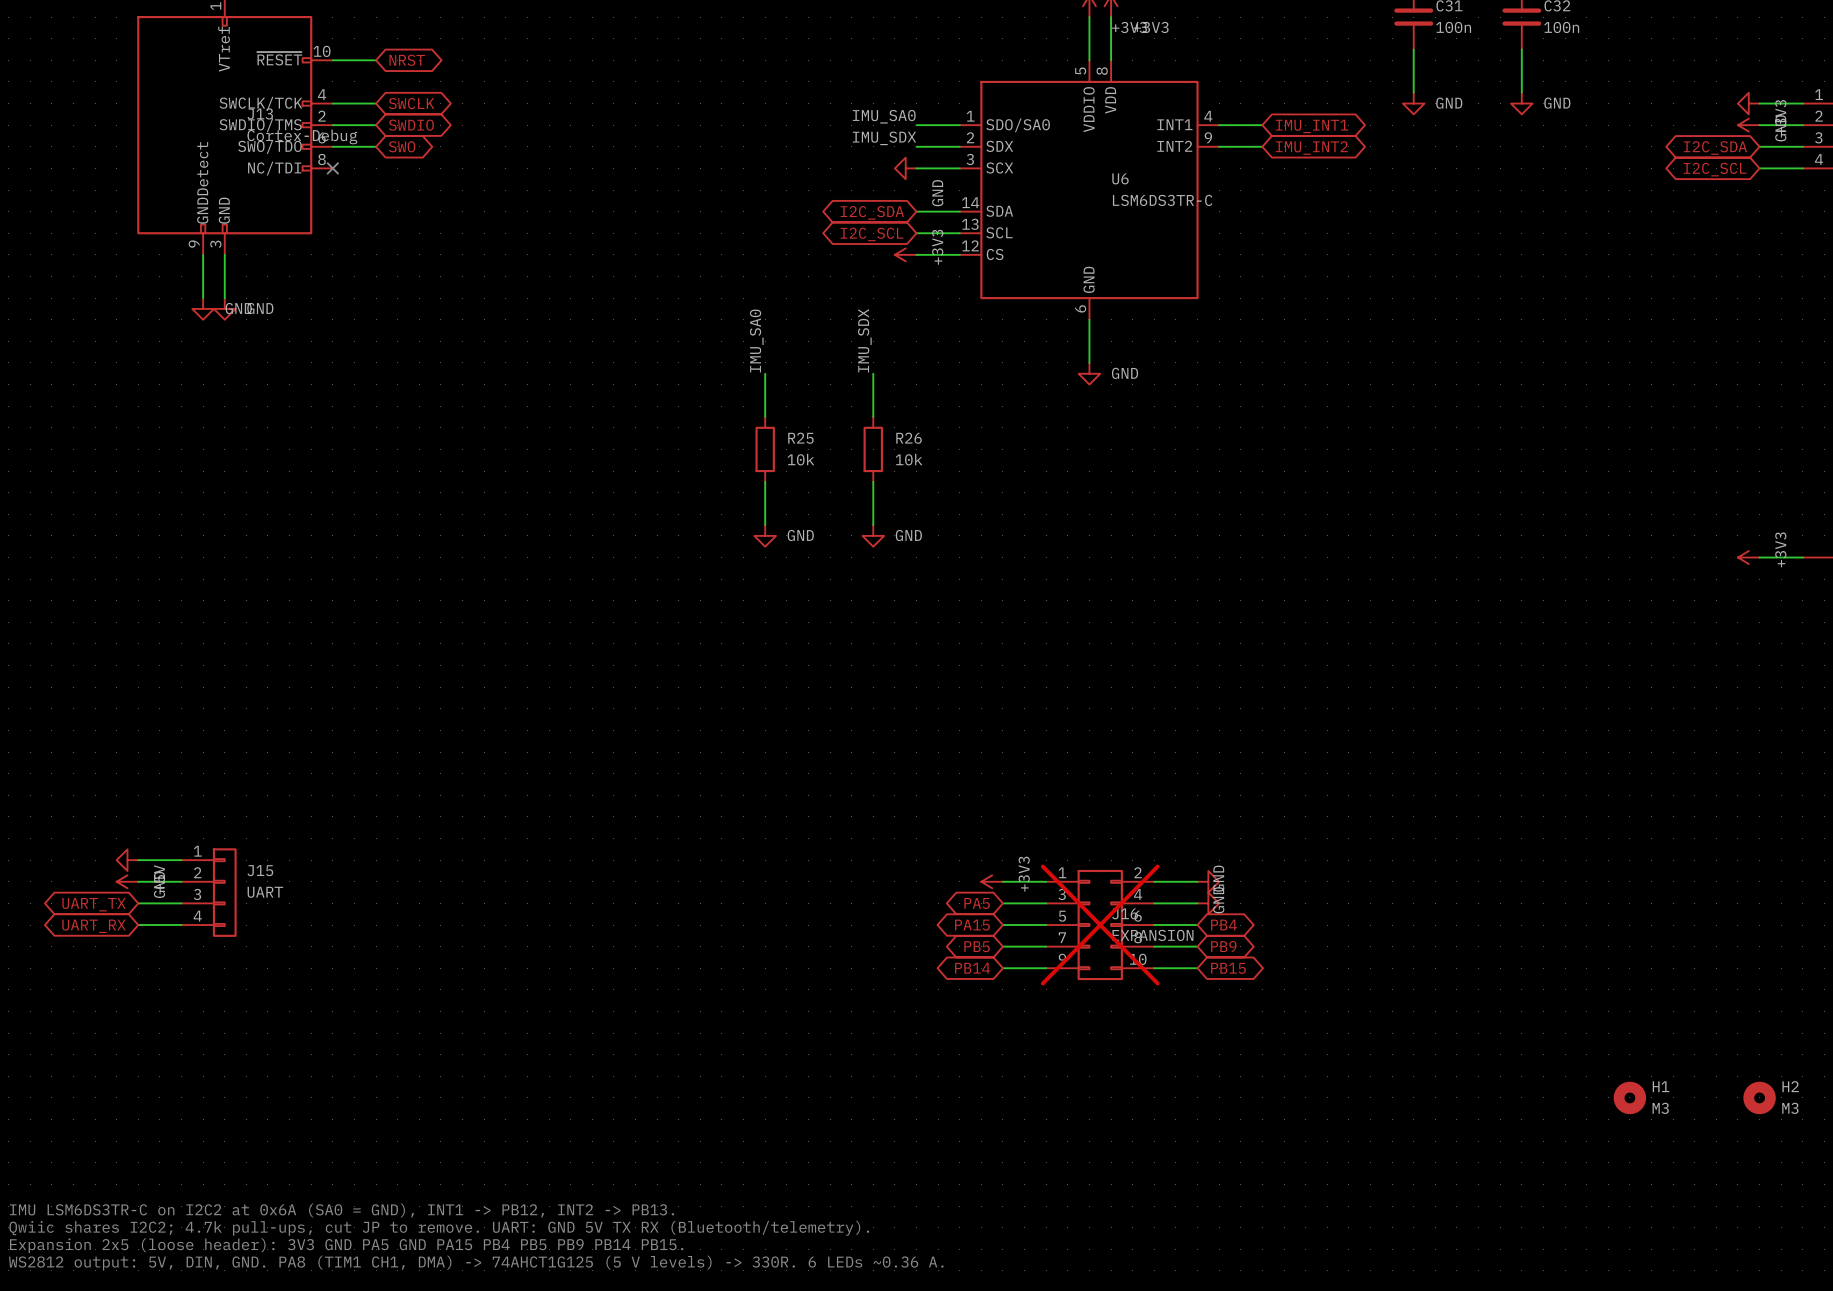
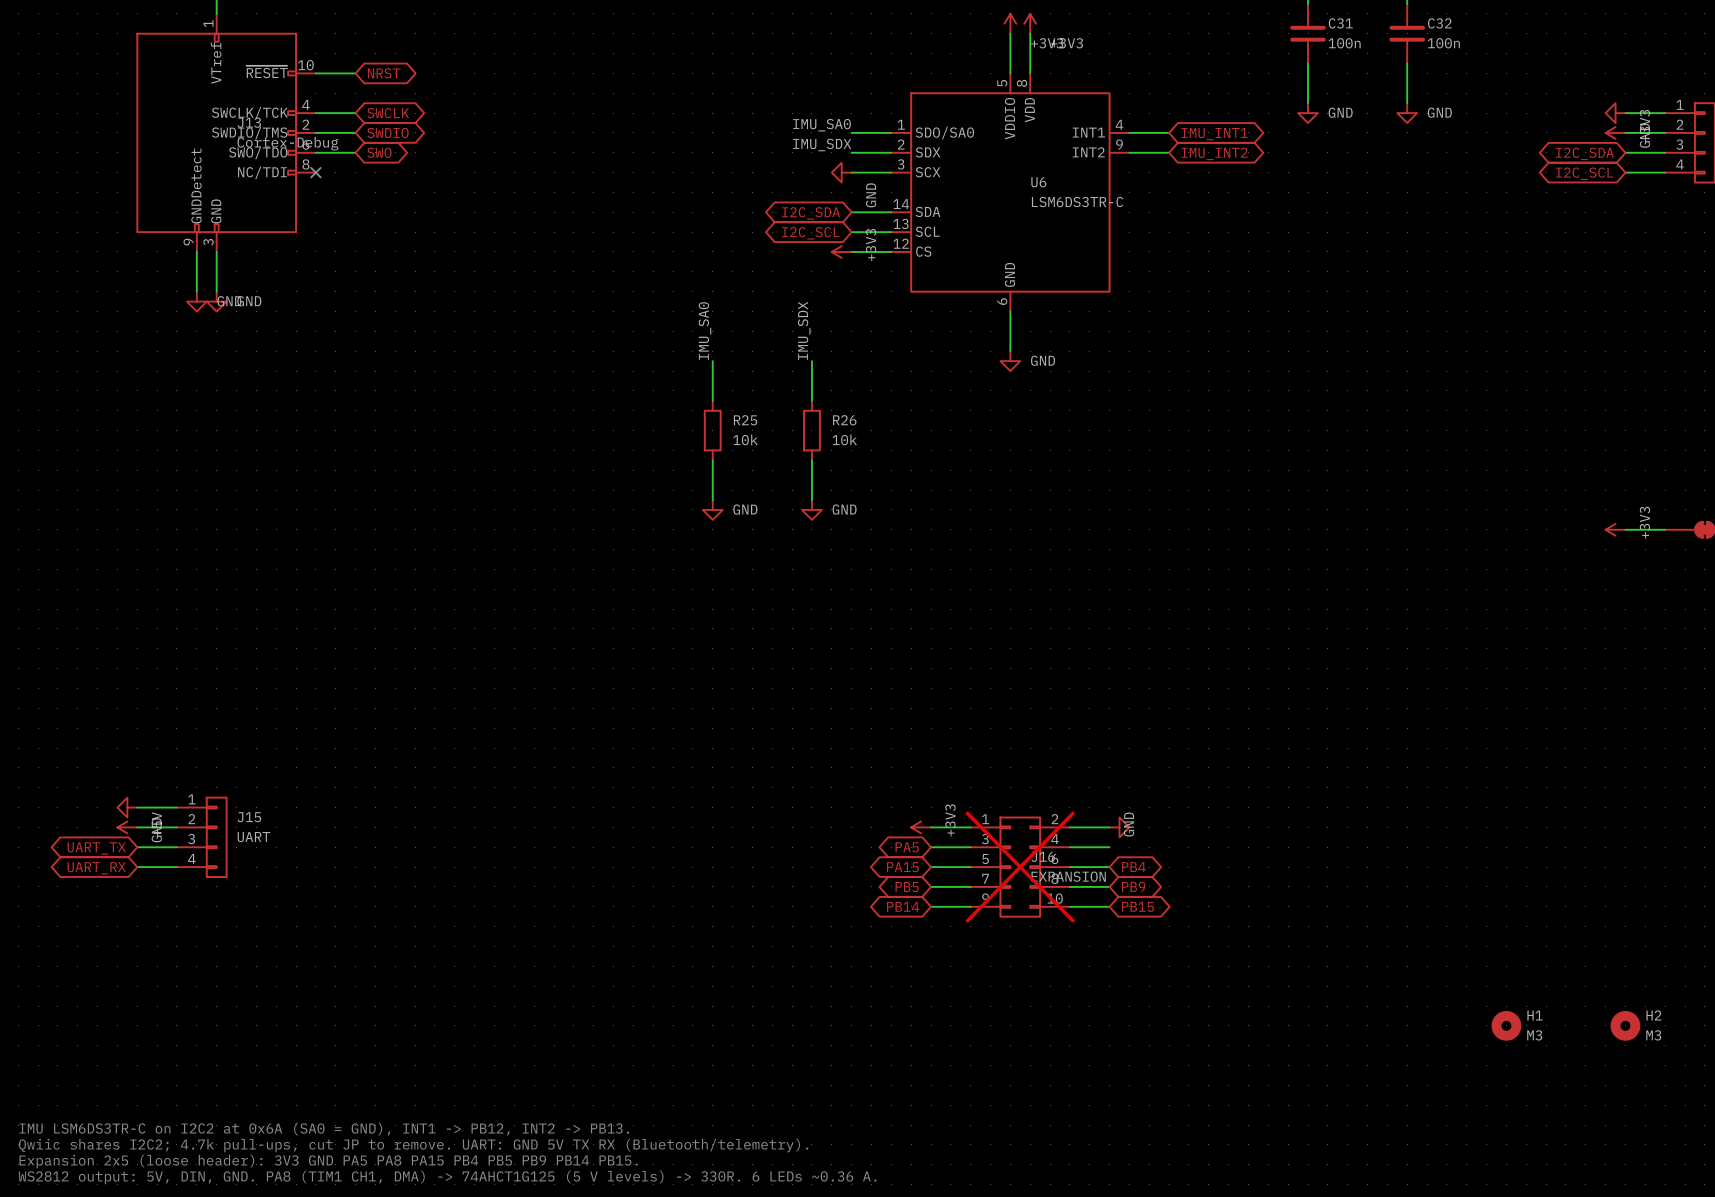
power symbol: GND (1208, 903) -> none
text: Expansion 2x5 (loose header): 3V3 GND PA5 GND PA15 PB4 PB5 PB9 PB14 PB15. (346, 1245) -> Expansion 2x5 (loose header): 3V3 GND PA5 PA8 PA15 PB4 PB5 PB9 PB14 PB15. (328, 1161)

